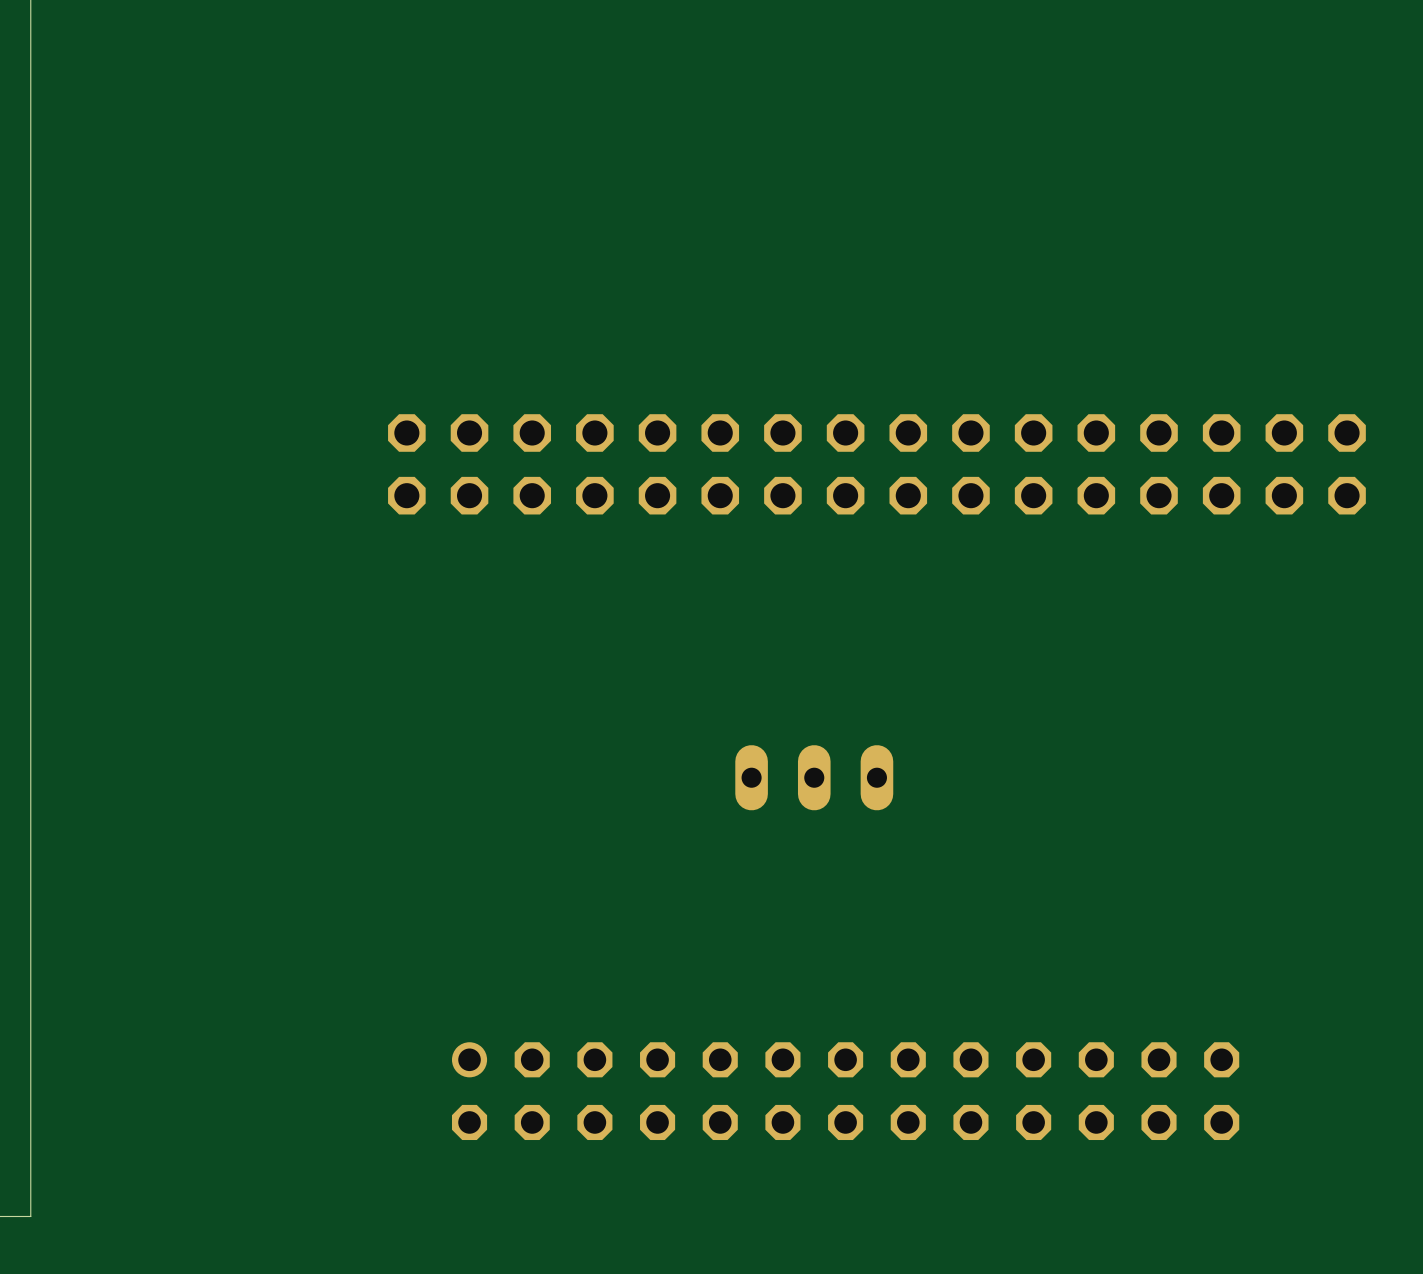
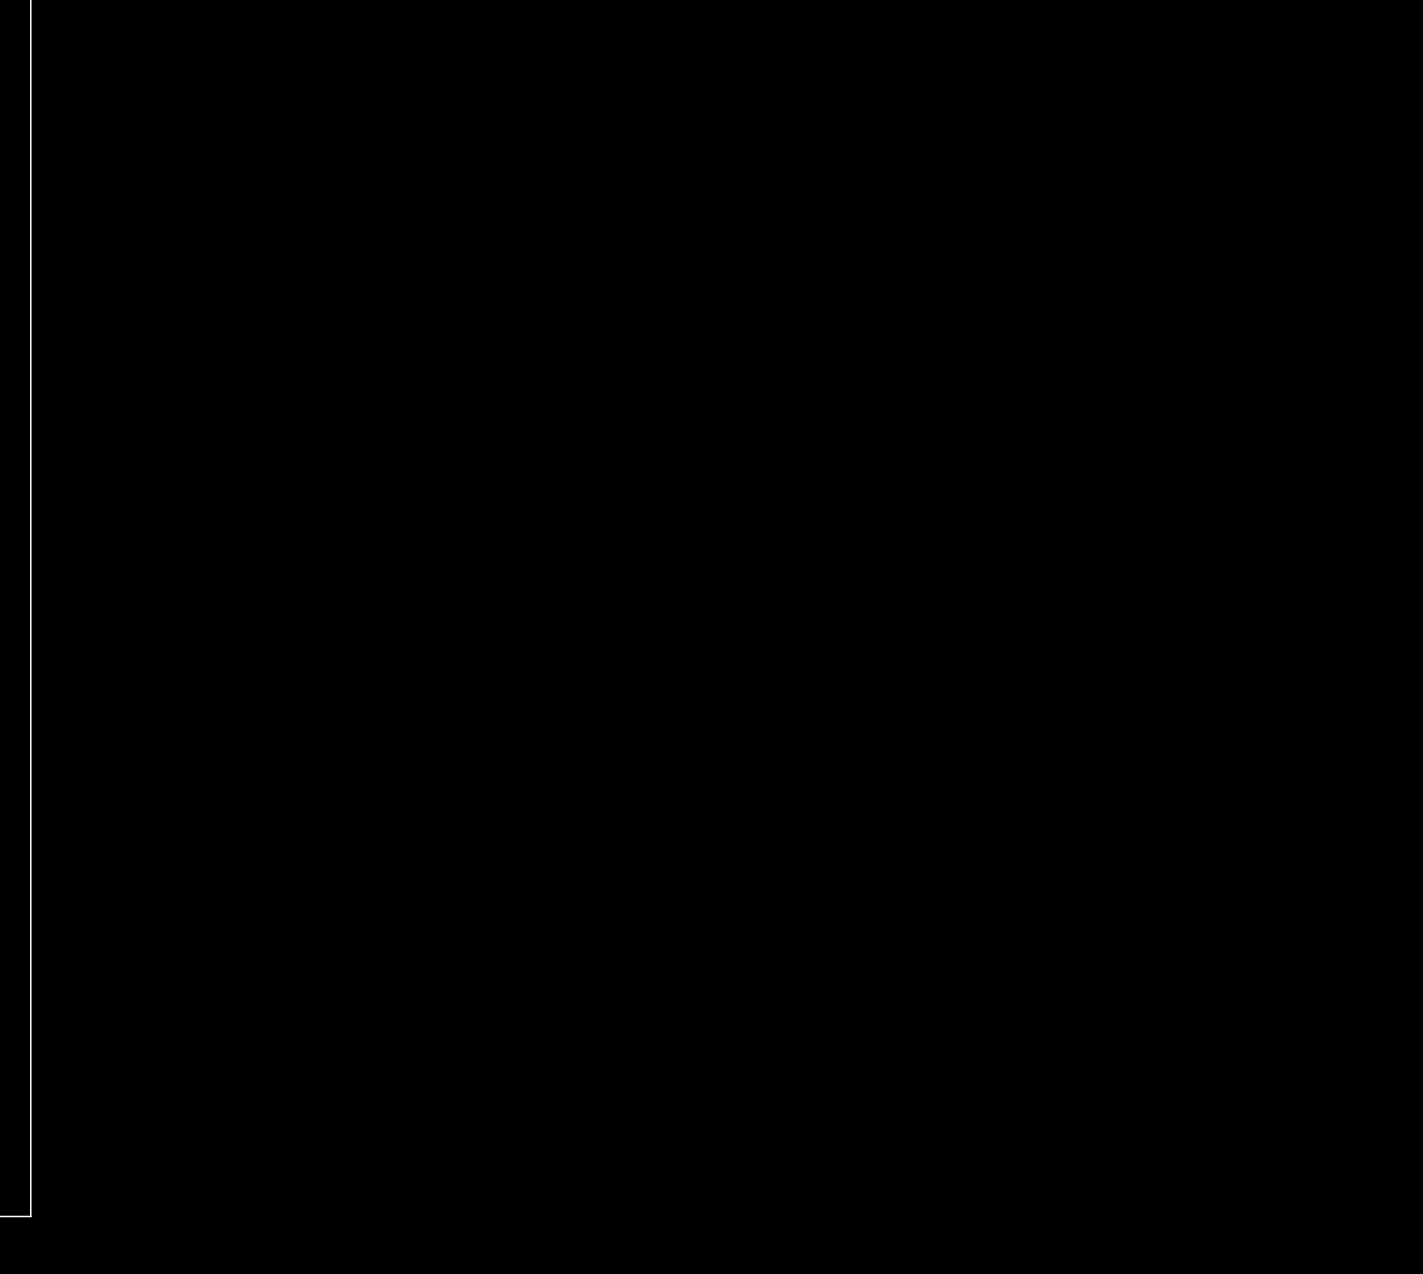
part: (876, 464) -> none
part: (814, 777) -> none
part: (845, 1091) -> none

